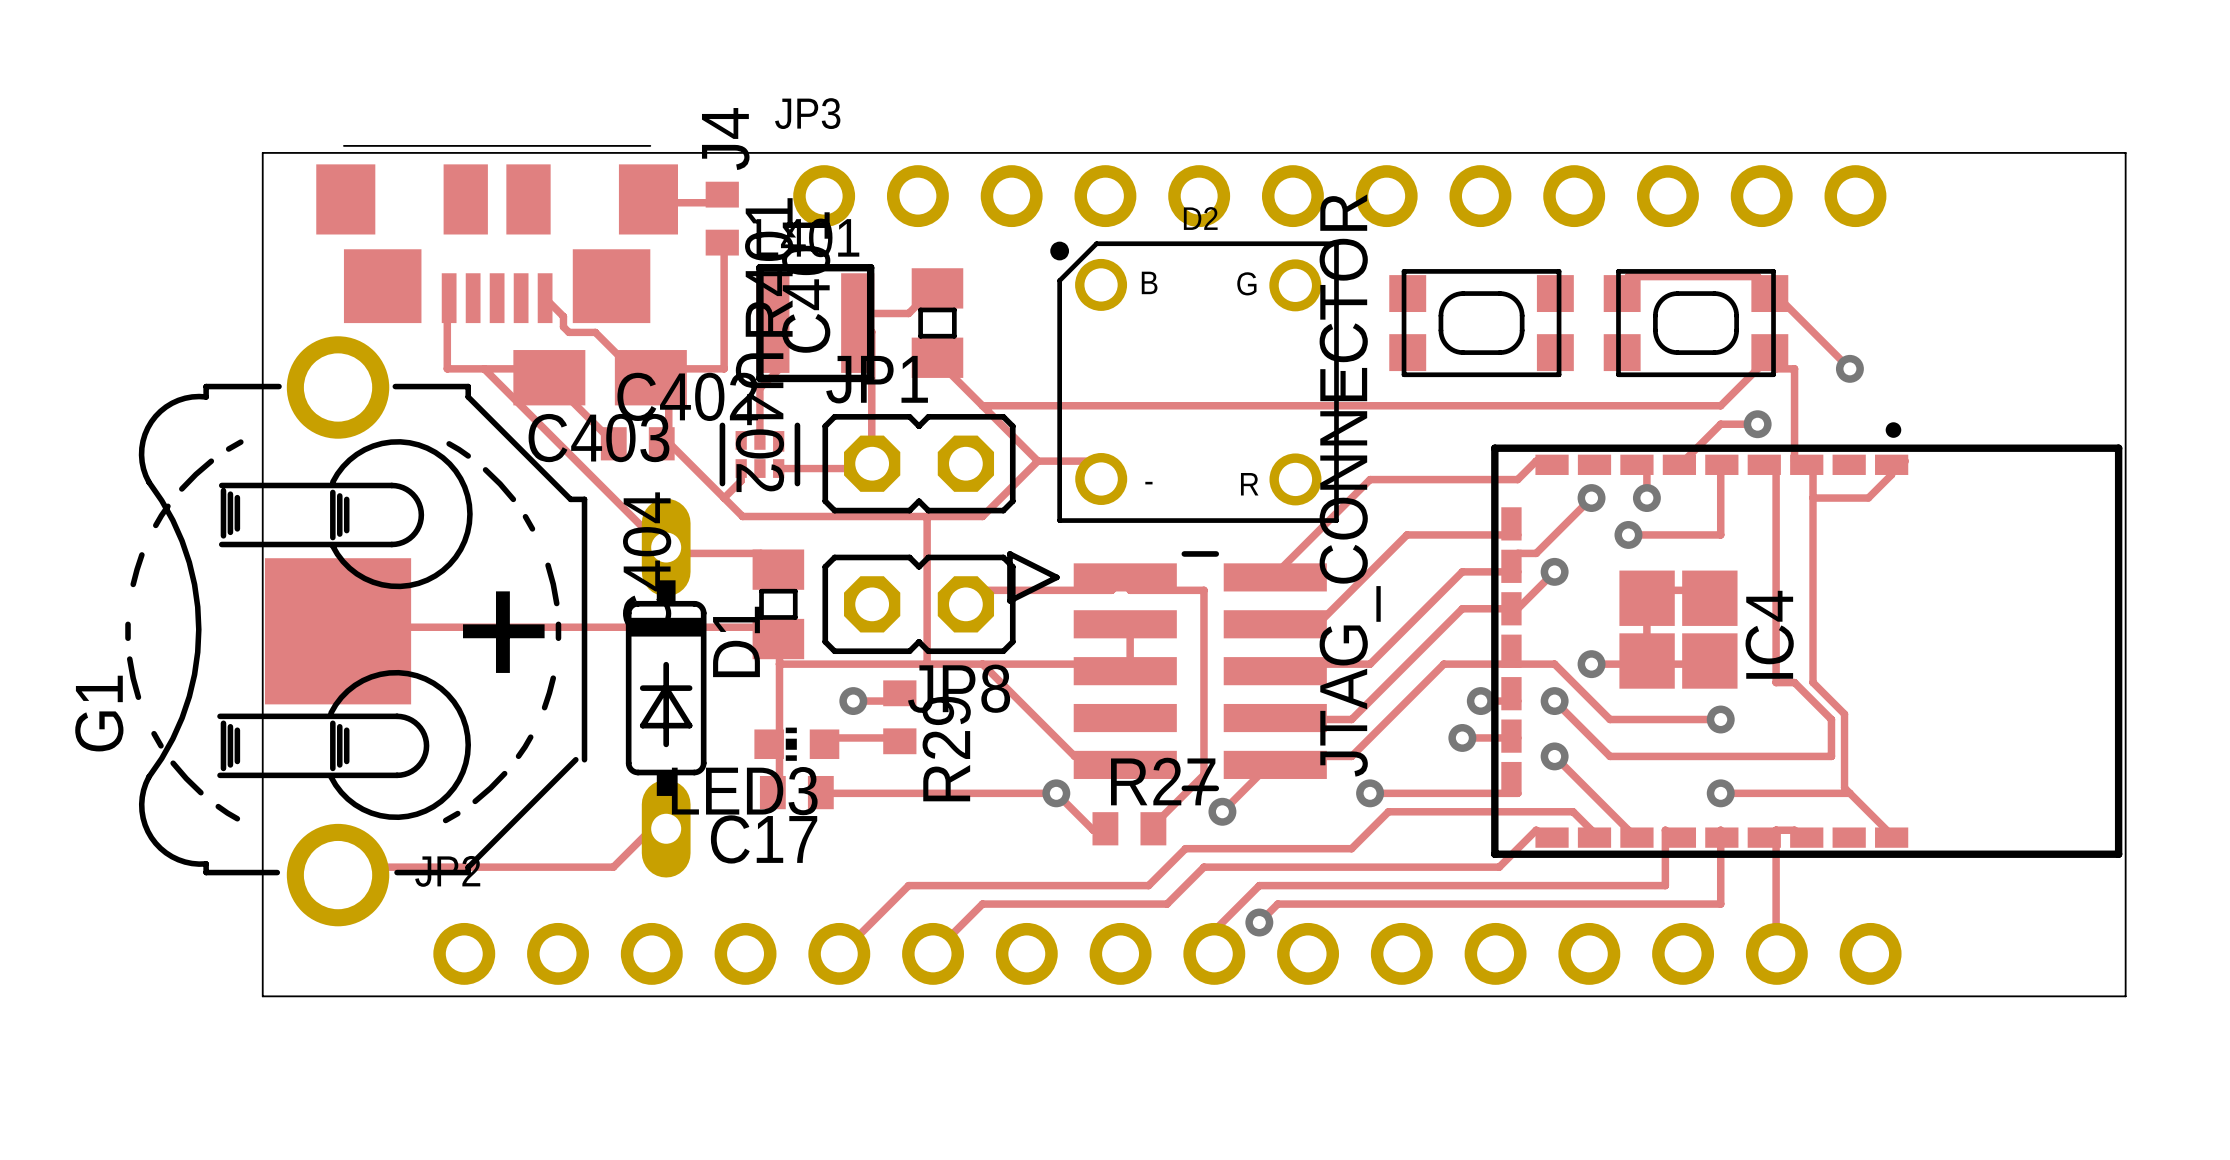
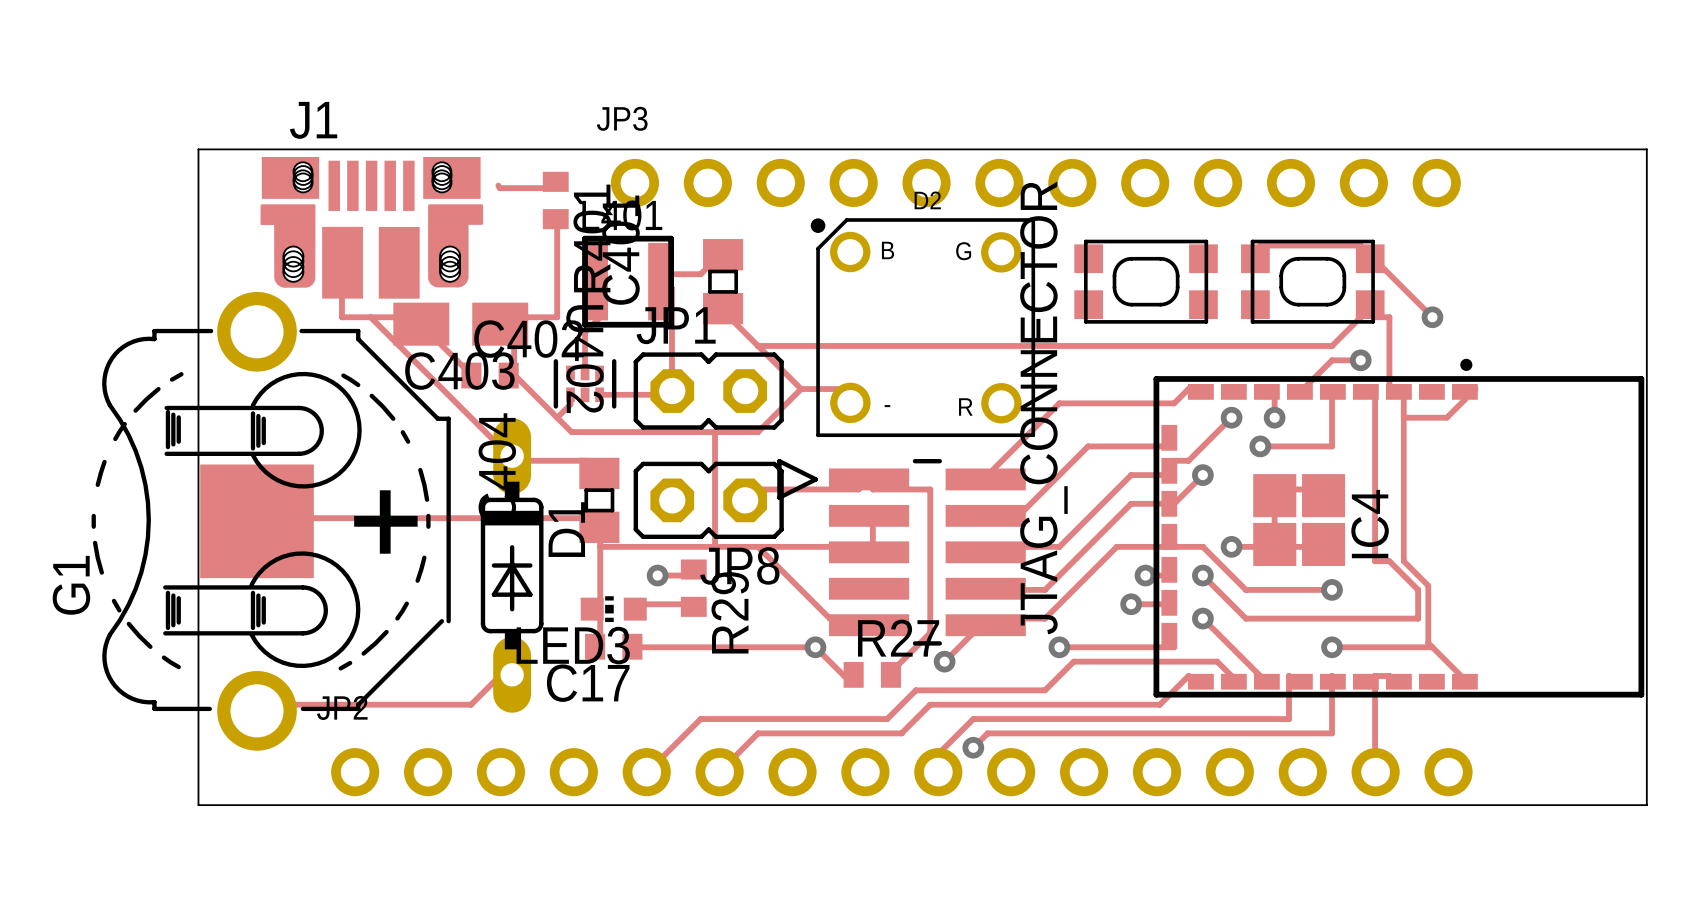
J4: (497, 234) -> none
J1: none -> (371, 227)
track: (545, 298) (563, 316) (563, 326) (568, 332) (595, 332) (631, 368) -> none

